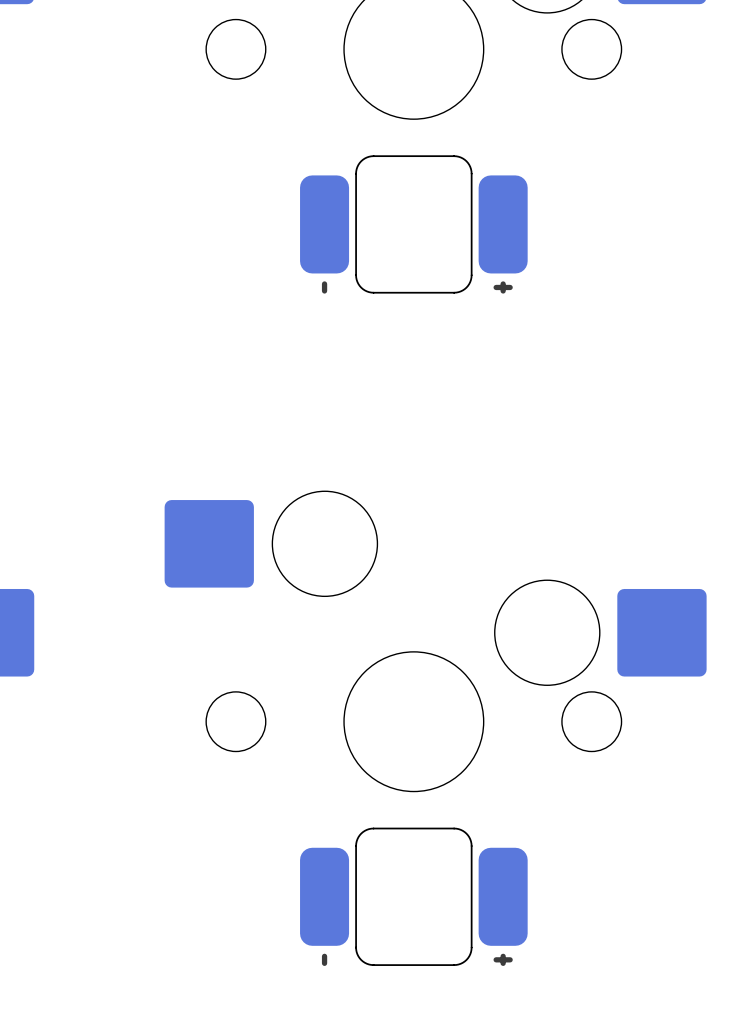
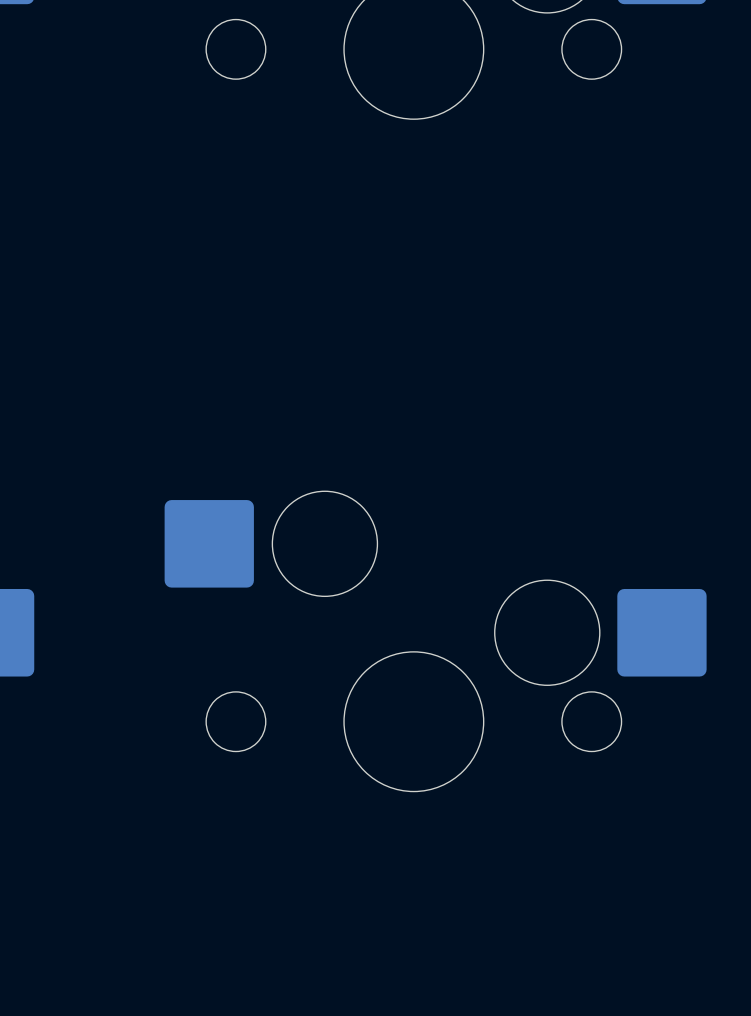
part: (413, 224) -> none
part: (413, 896) -> none

